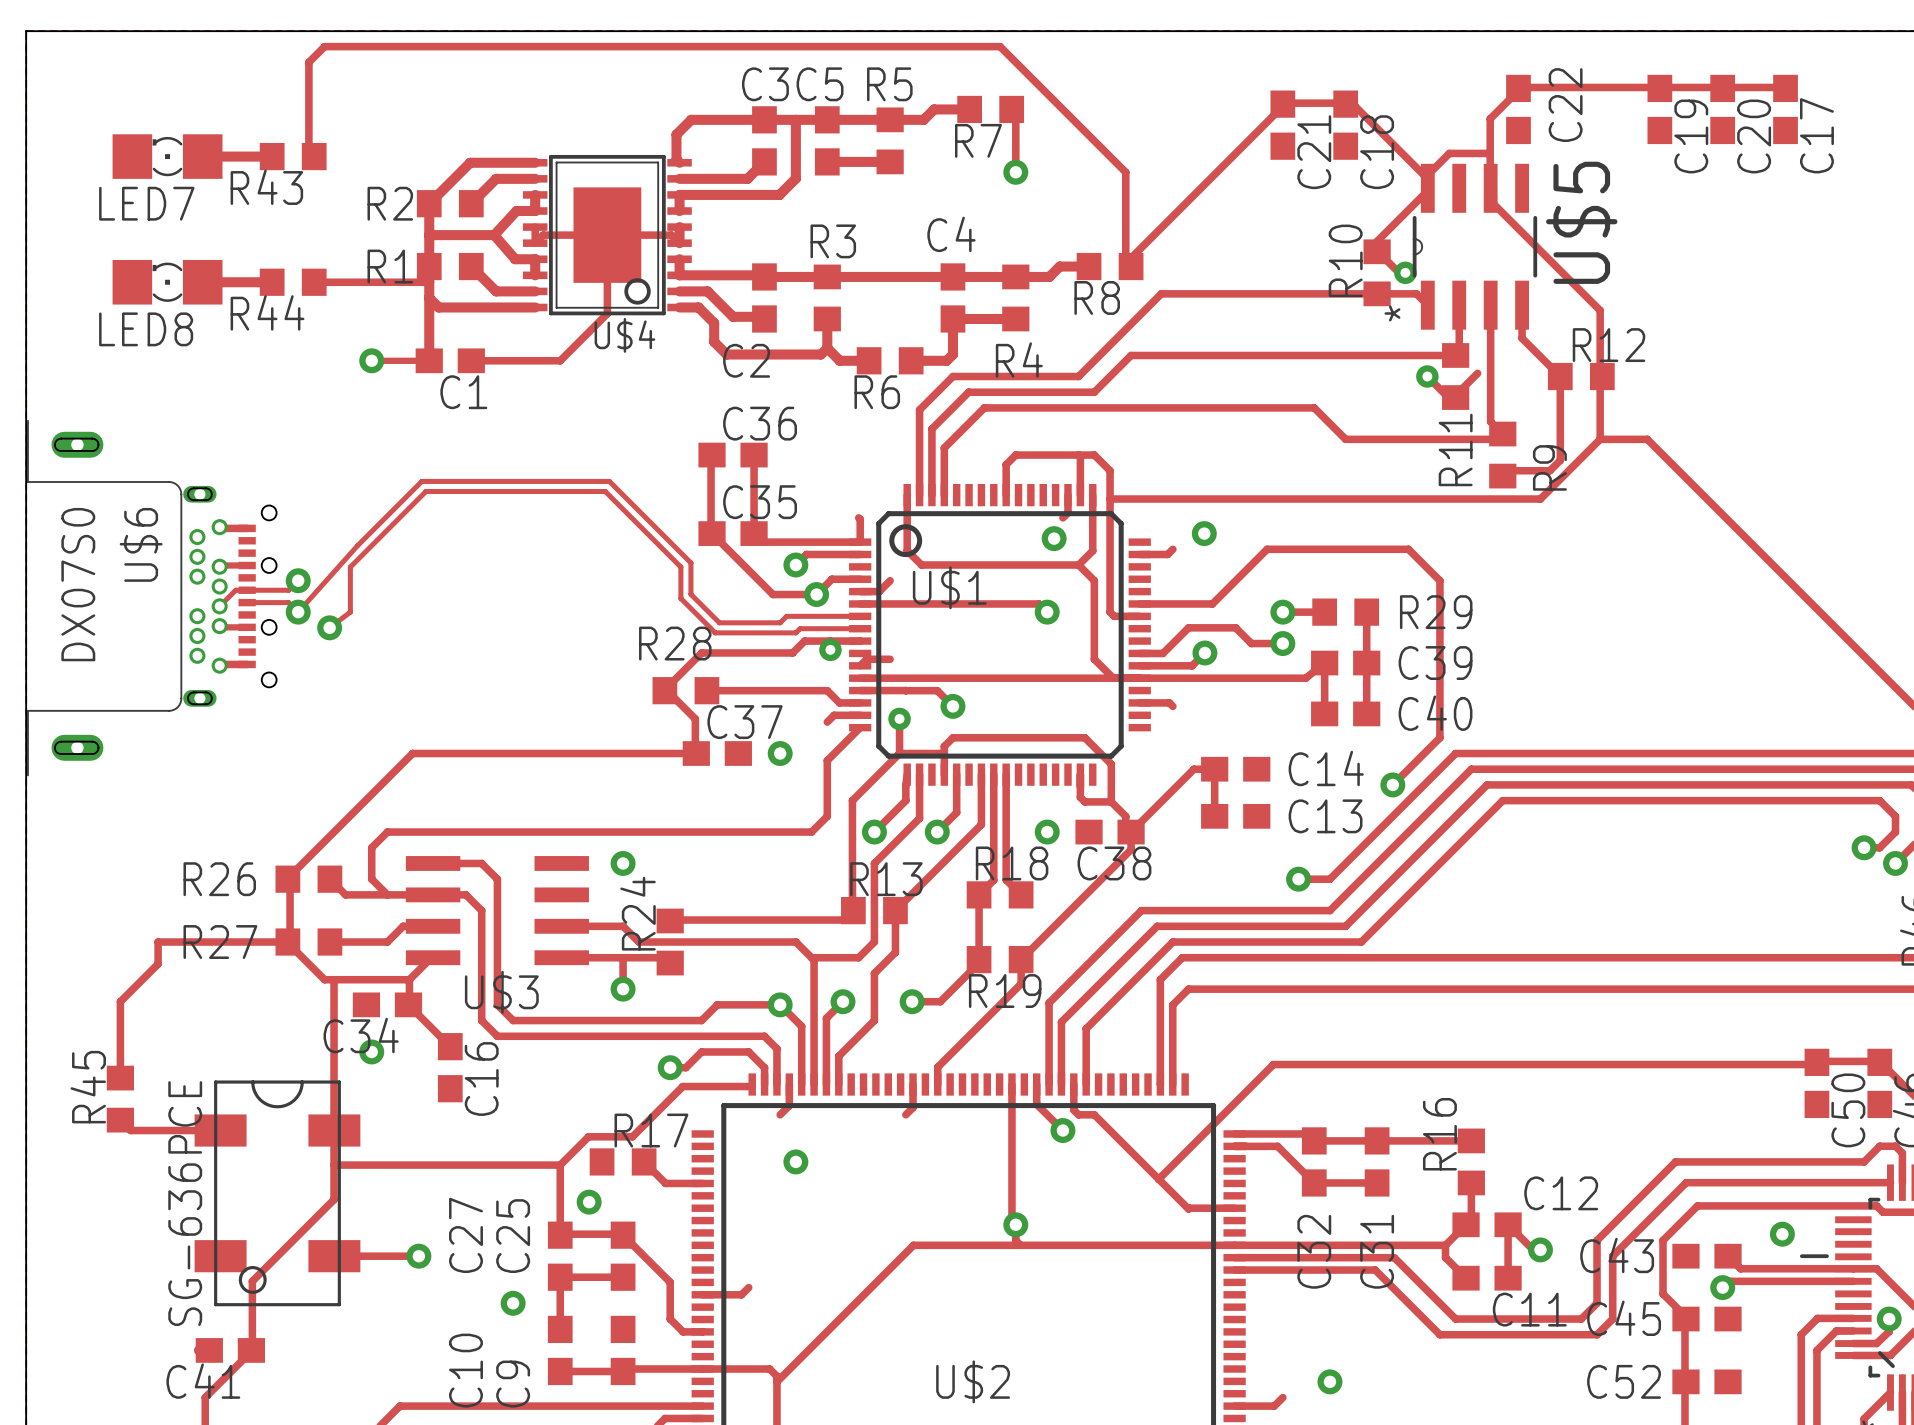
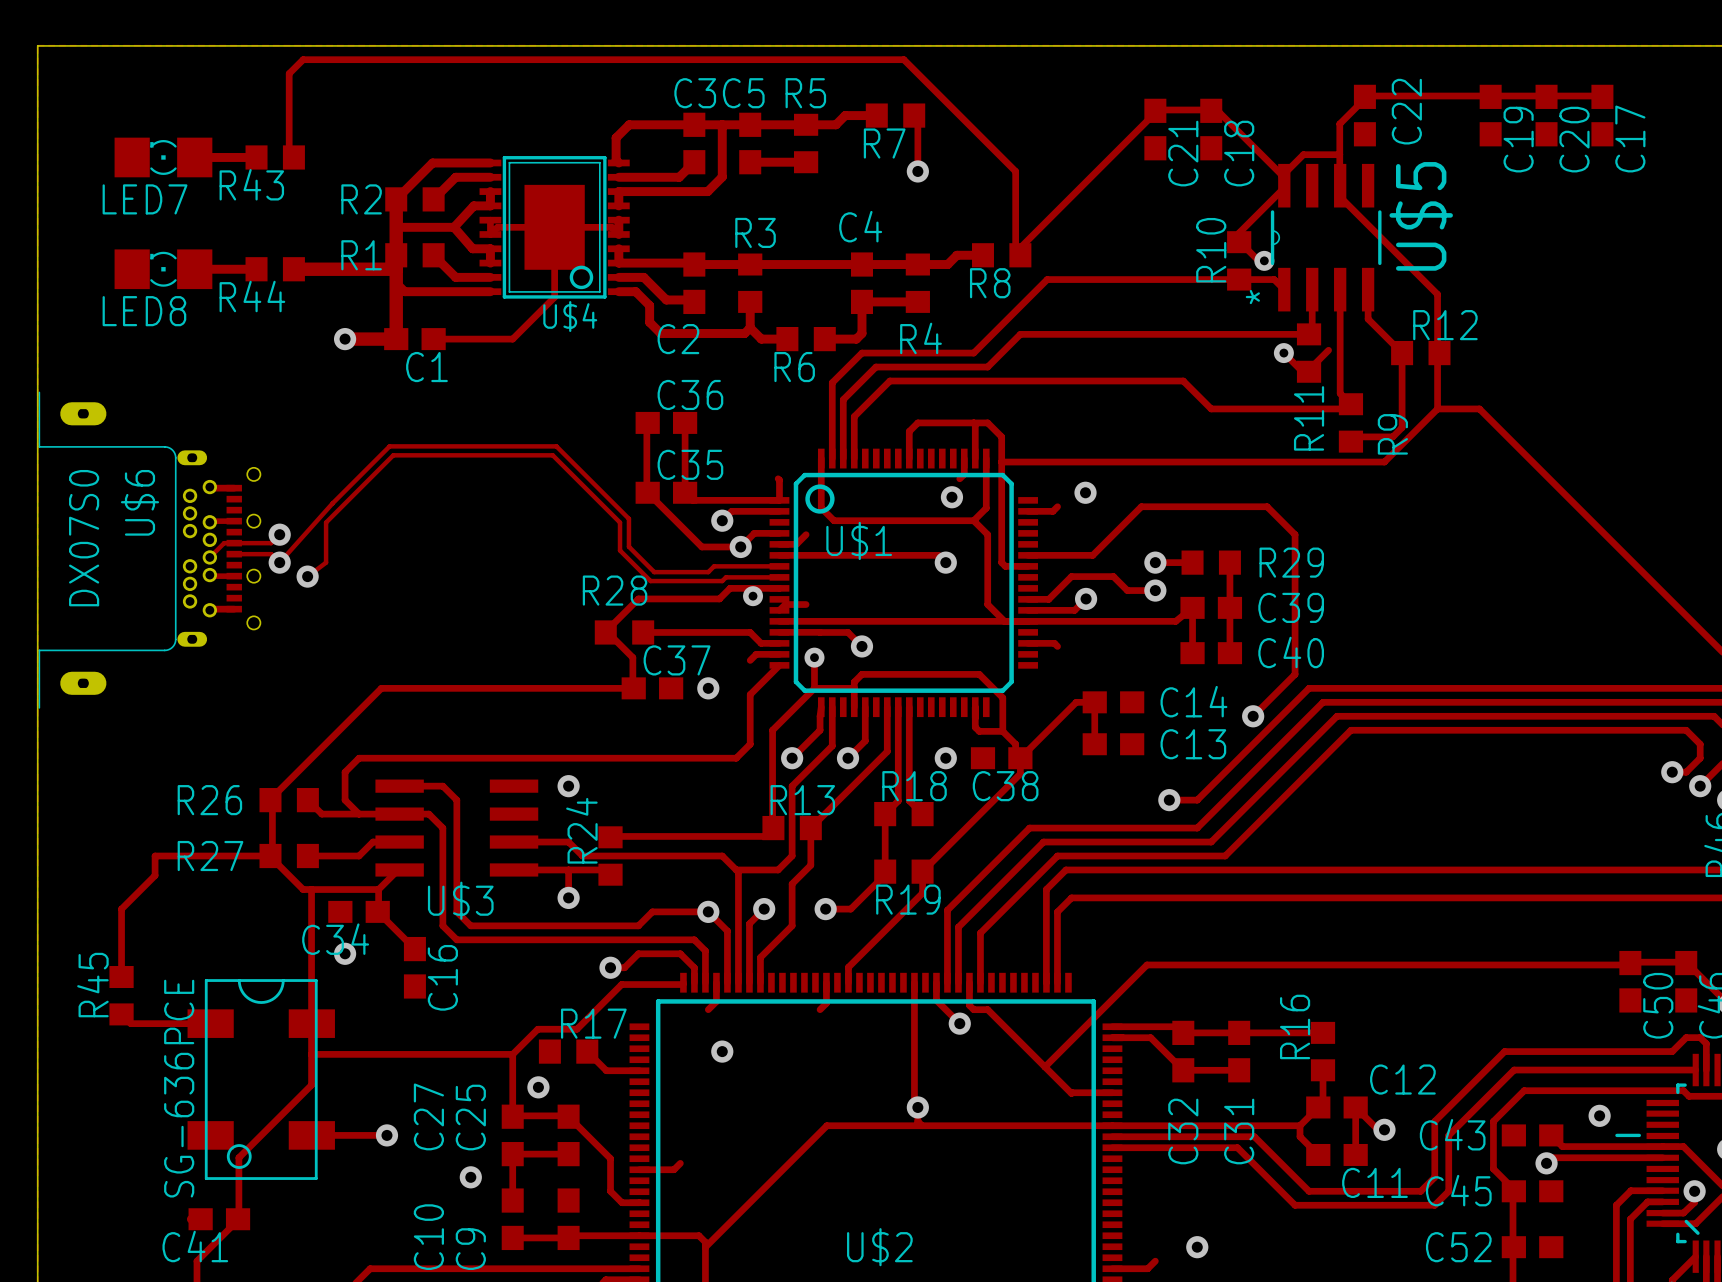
track width: thin (429, 203) (429, 360) (371, 360) -> thick (396, 199) (396, 339) (345, 339)
track width: thin (314, 282) (429, 282) -> thick (293, 269) (396, 269)

